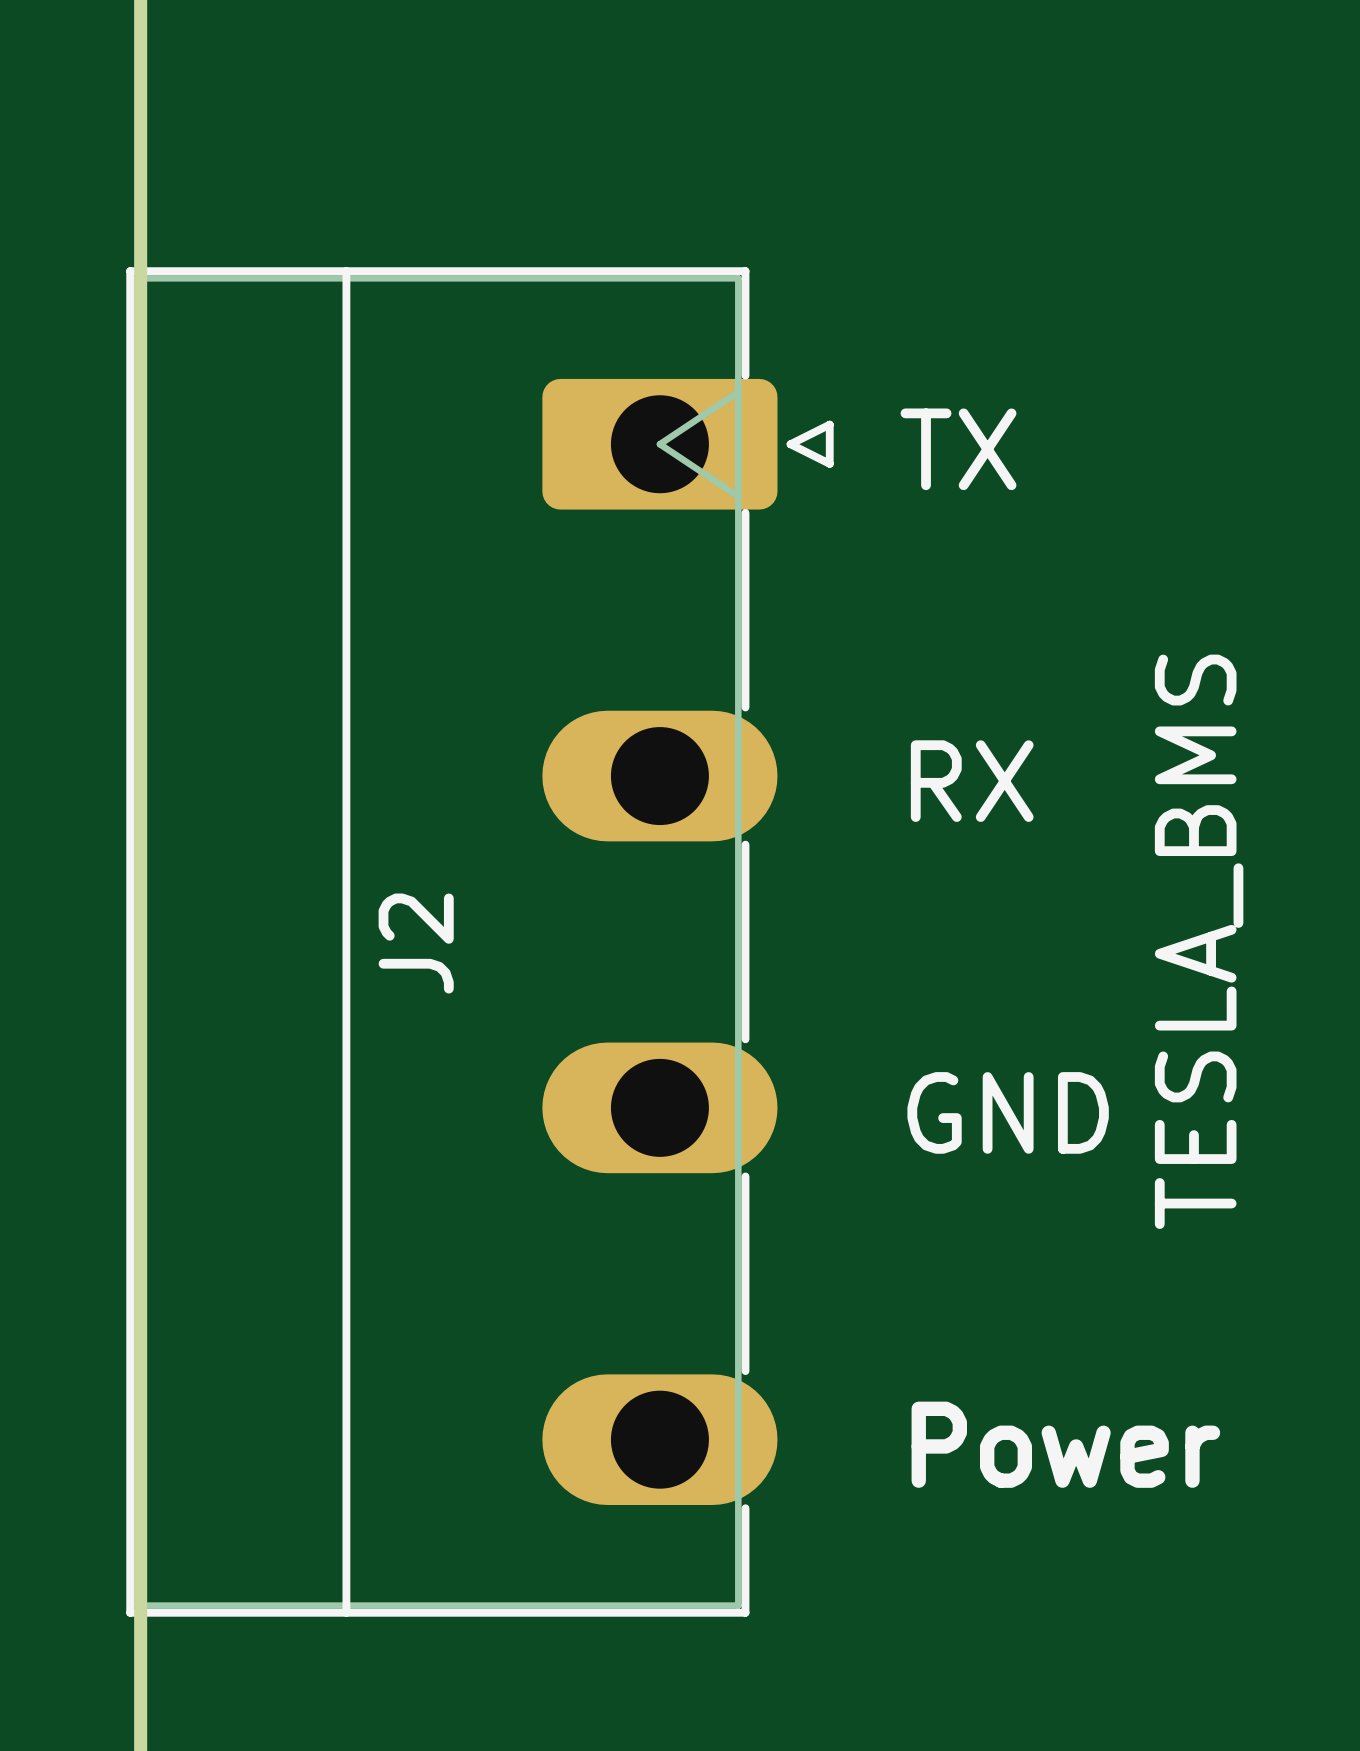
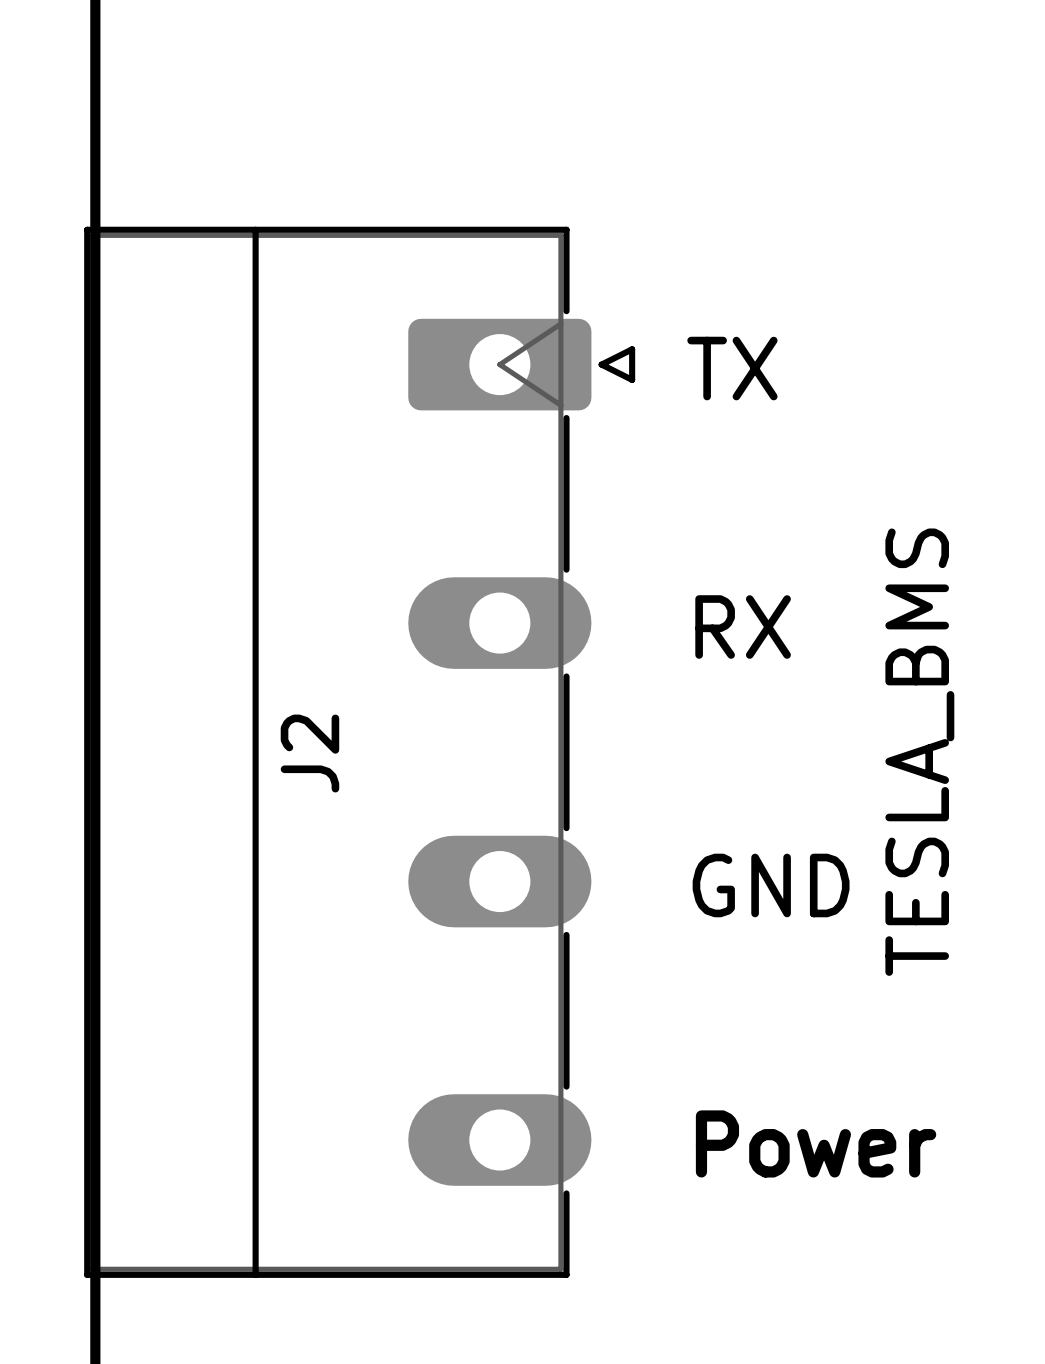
J2 footprint: [126, 267, 834, 1617] -> [84, 226, 636, 1278]

